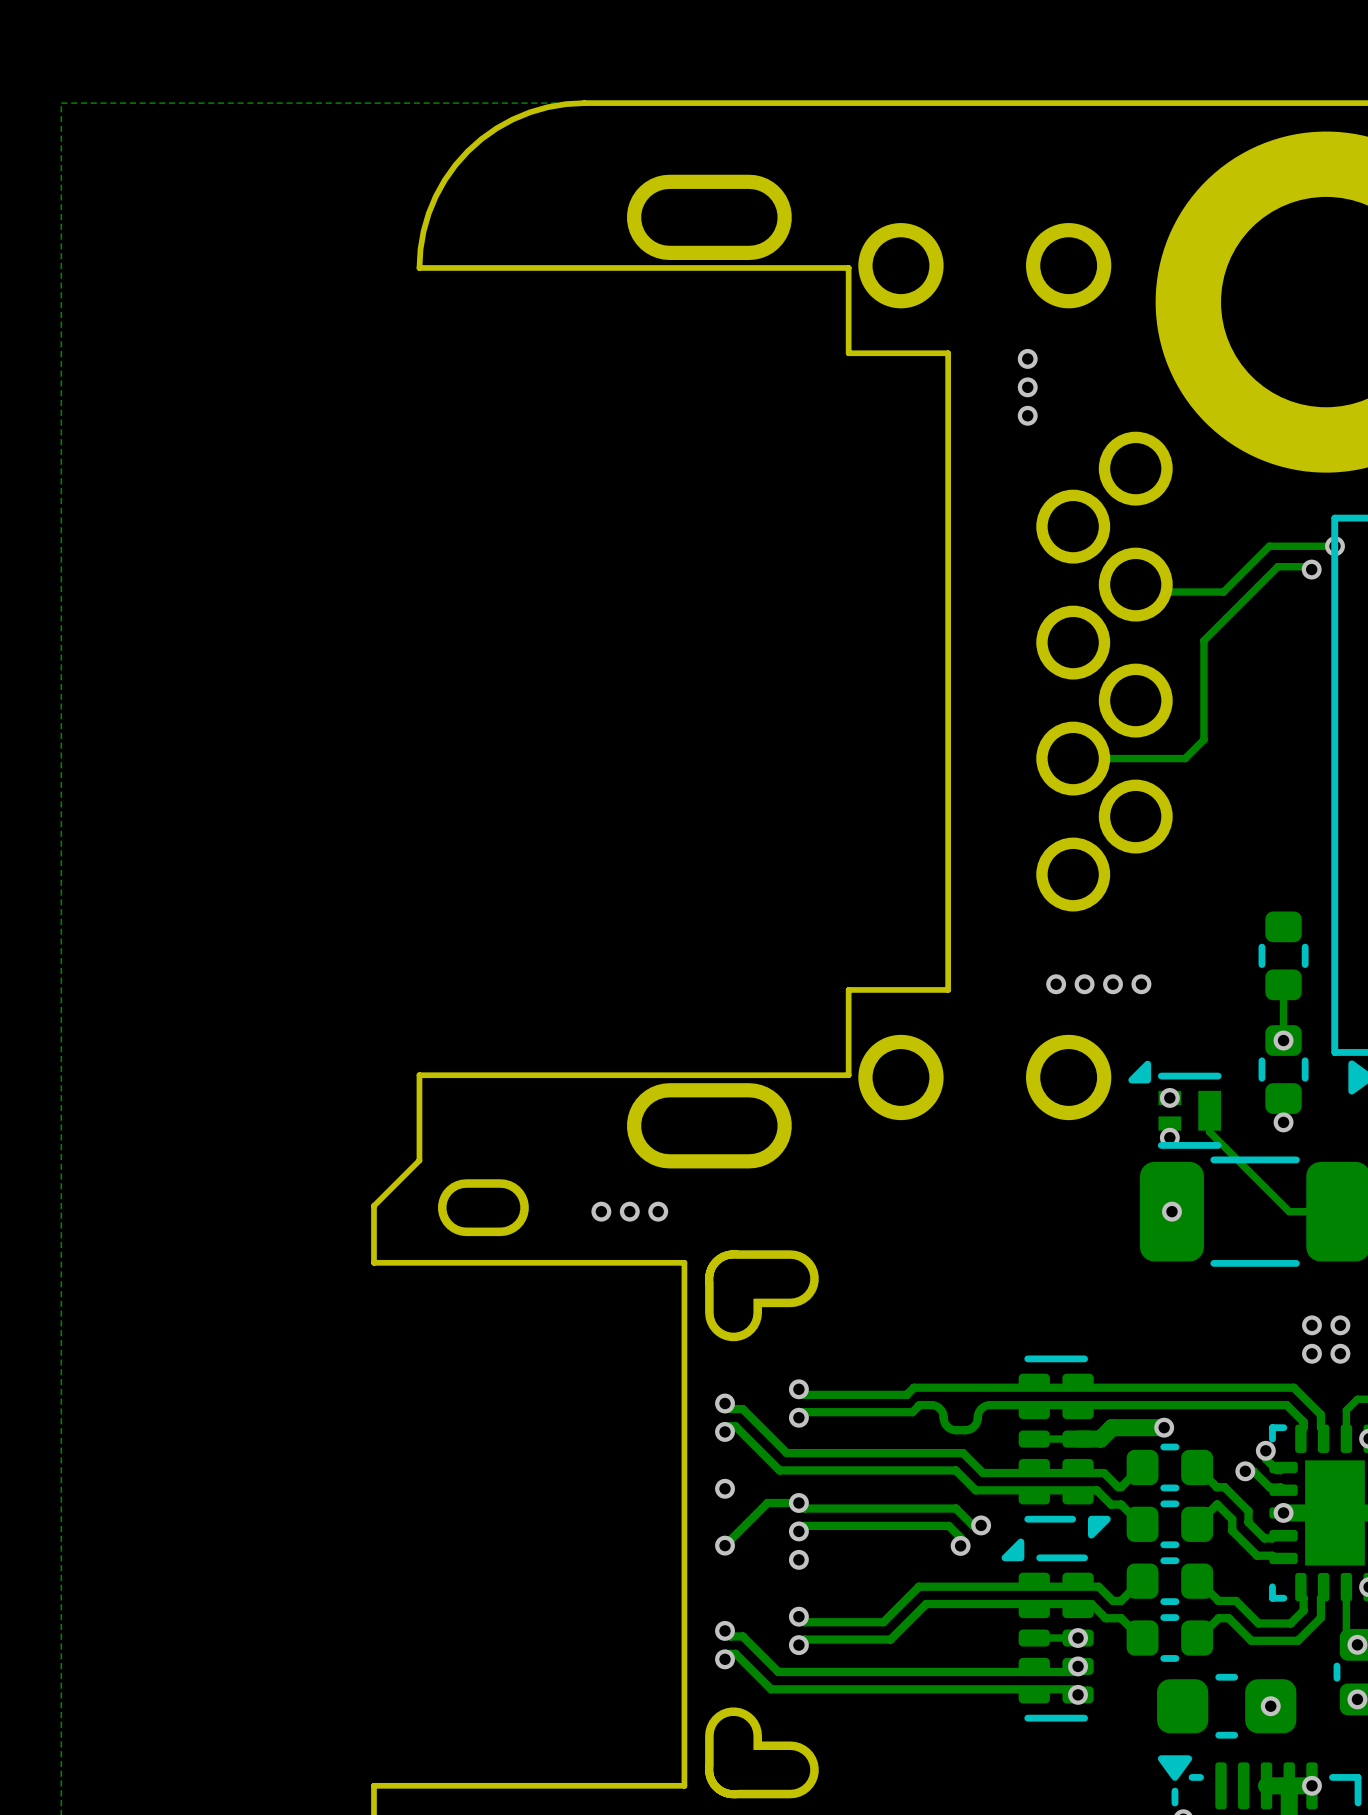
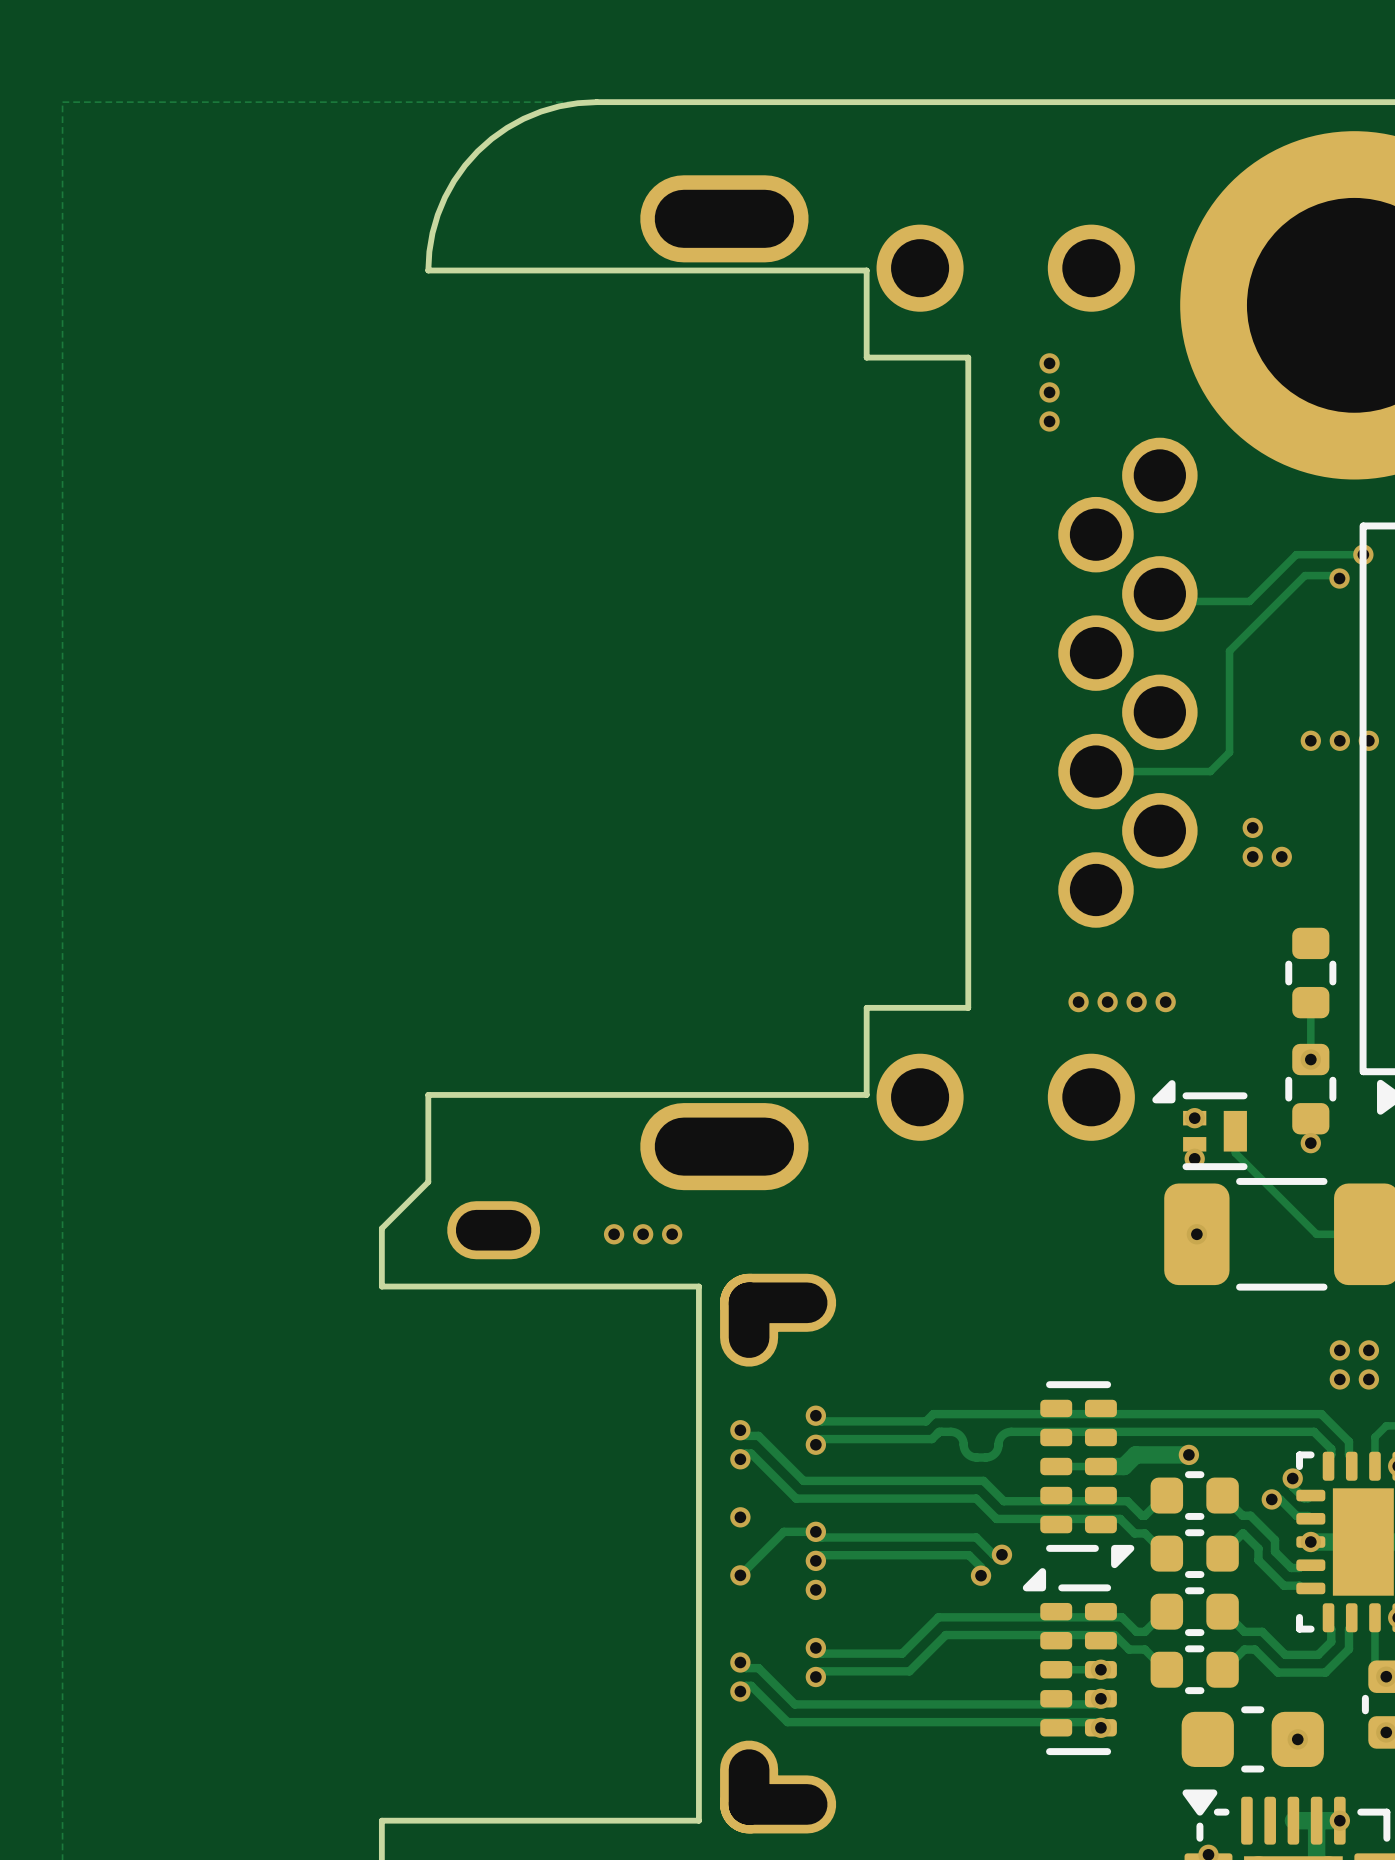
via: none -> (1310, 740)
via: none -> (1339, 740)
via: none -> (1368, 740)
via: none -> (1252, 827)
via: none -> (1252, 856)
via: none -> (1281, 856)

